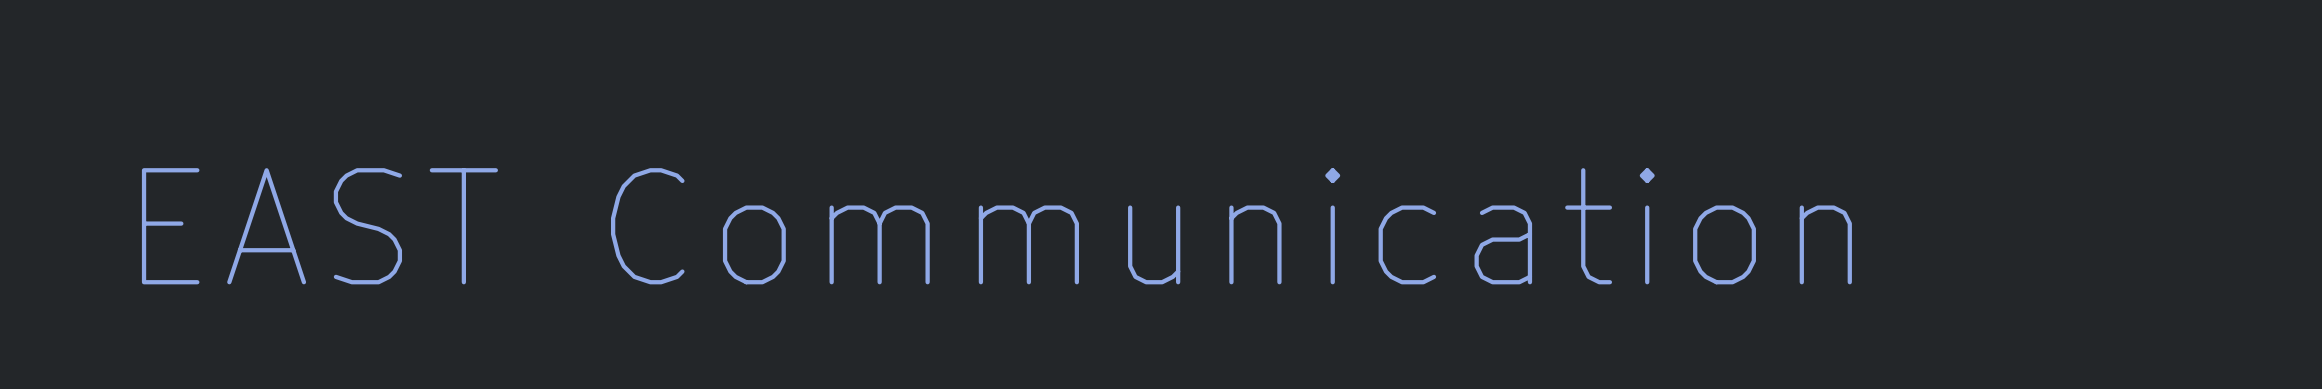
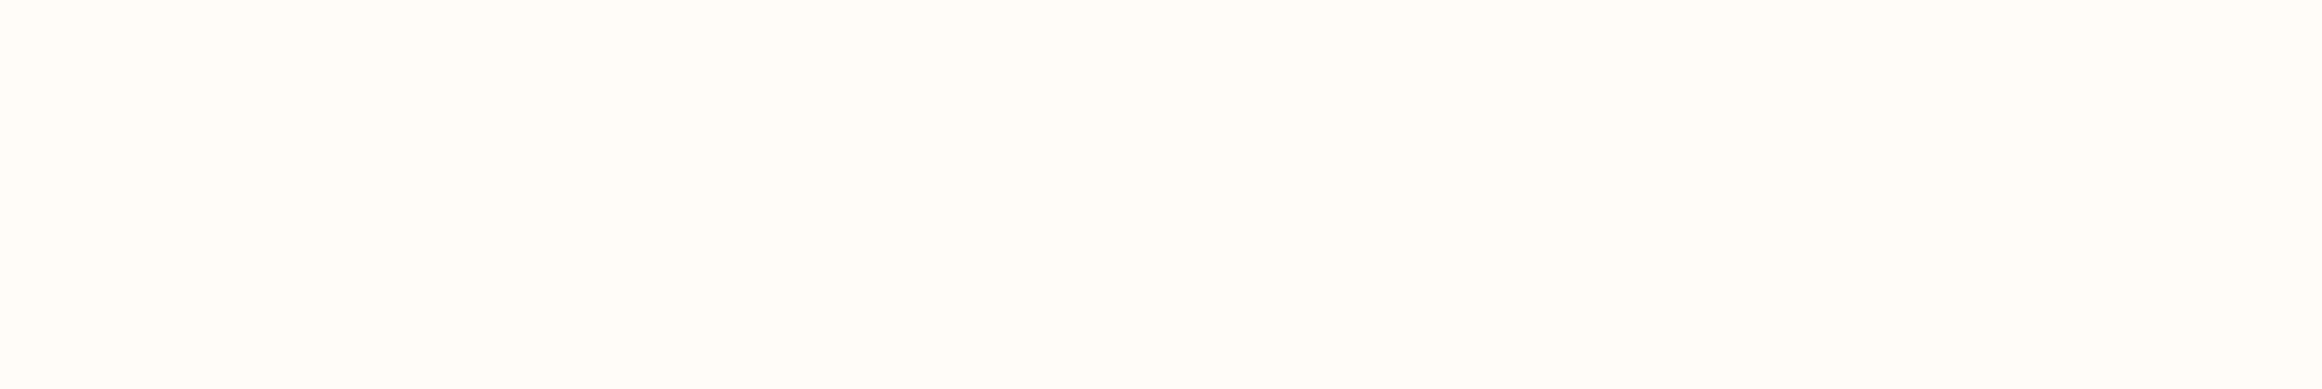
text: EAST Communication (996, 226) -> none

